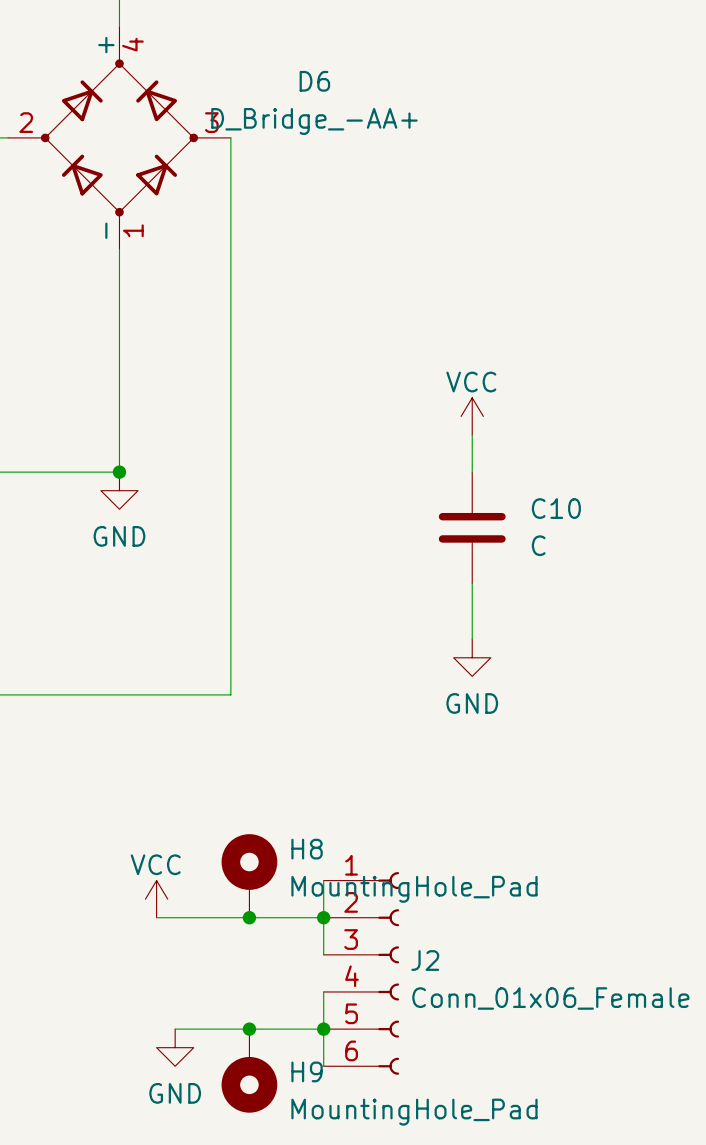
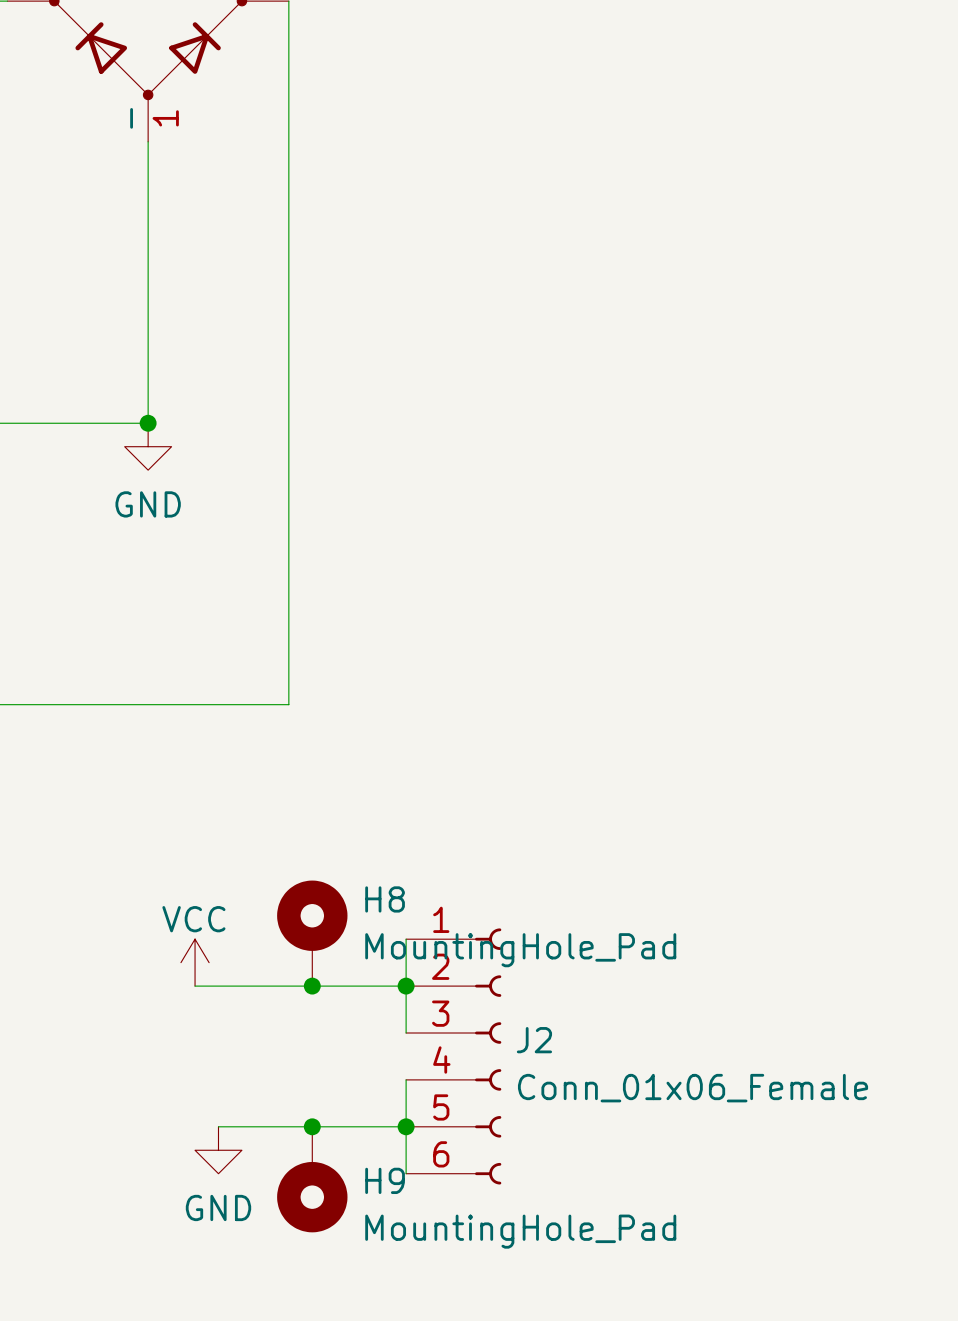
power symbol: VCC (472, 416) -> none
wire: (472, 434) (472, 472) -> none
C10: C (472, 527) -> none
wire: (472, 583) (472, 639) -> none
power symbol: GND (472, 657) -> none

